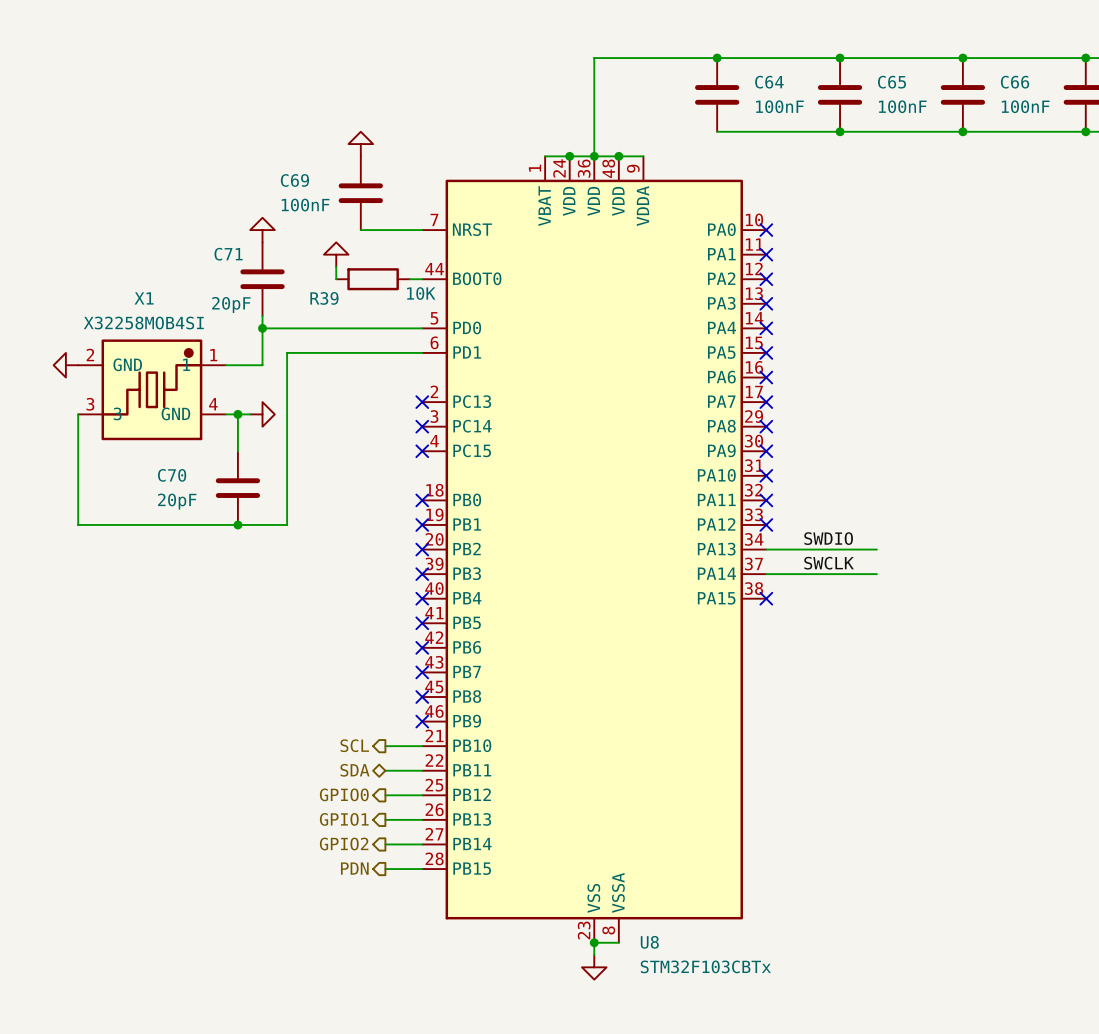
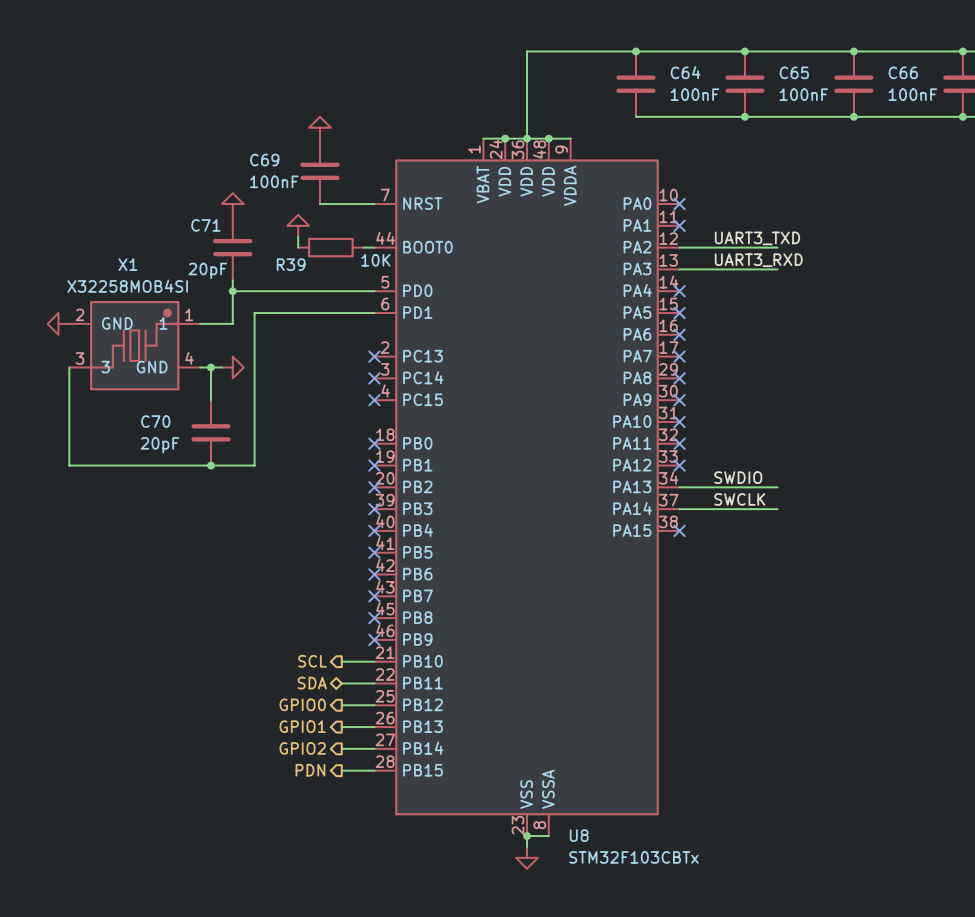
label: none -> UART3_TXD (757, 238)
wire: none -> (679, 247) (777, 247)
no-connect mark: (766, 279) -> none
label: none -> UART3_RXD (758, 260)
wire: none -> (679, 269) (777, 269)
no-connect mark: (766, 303) -> none

